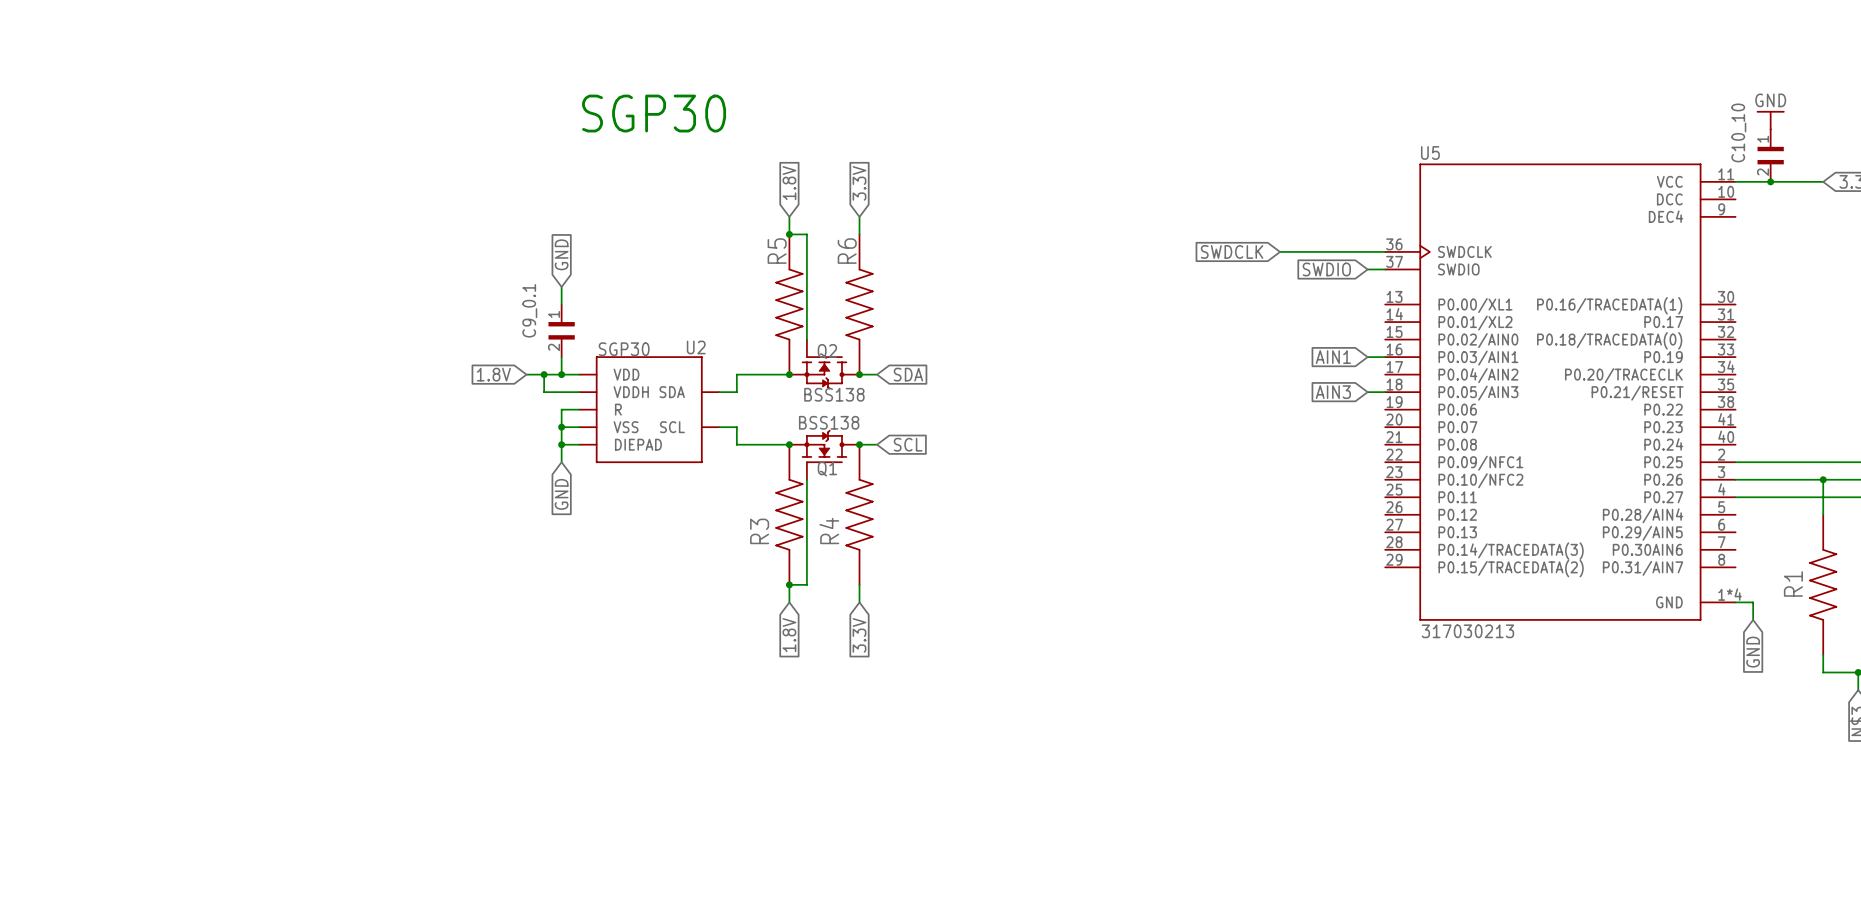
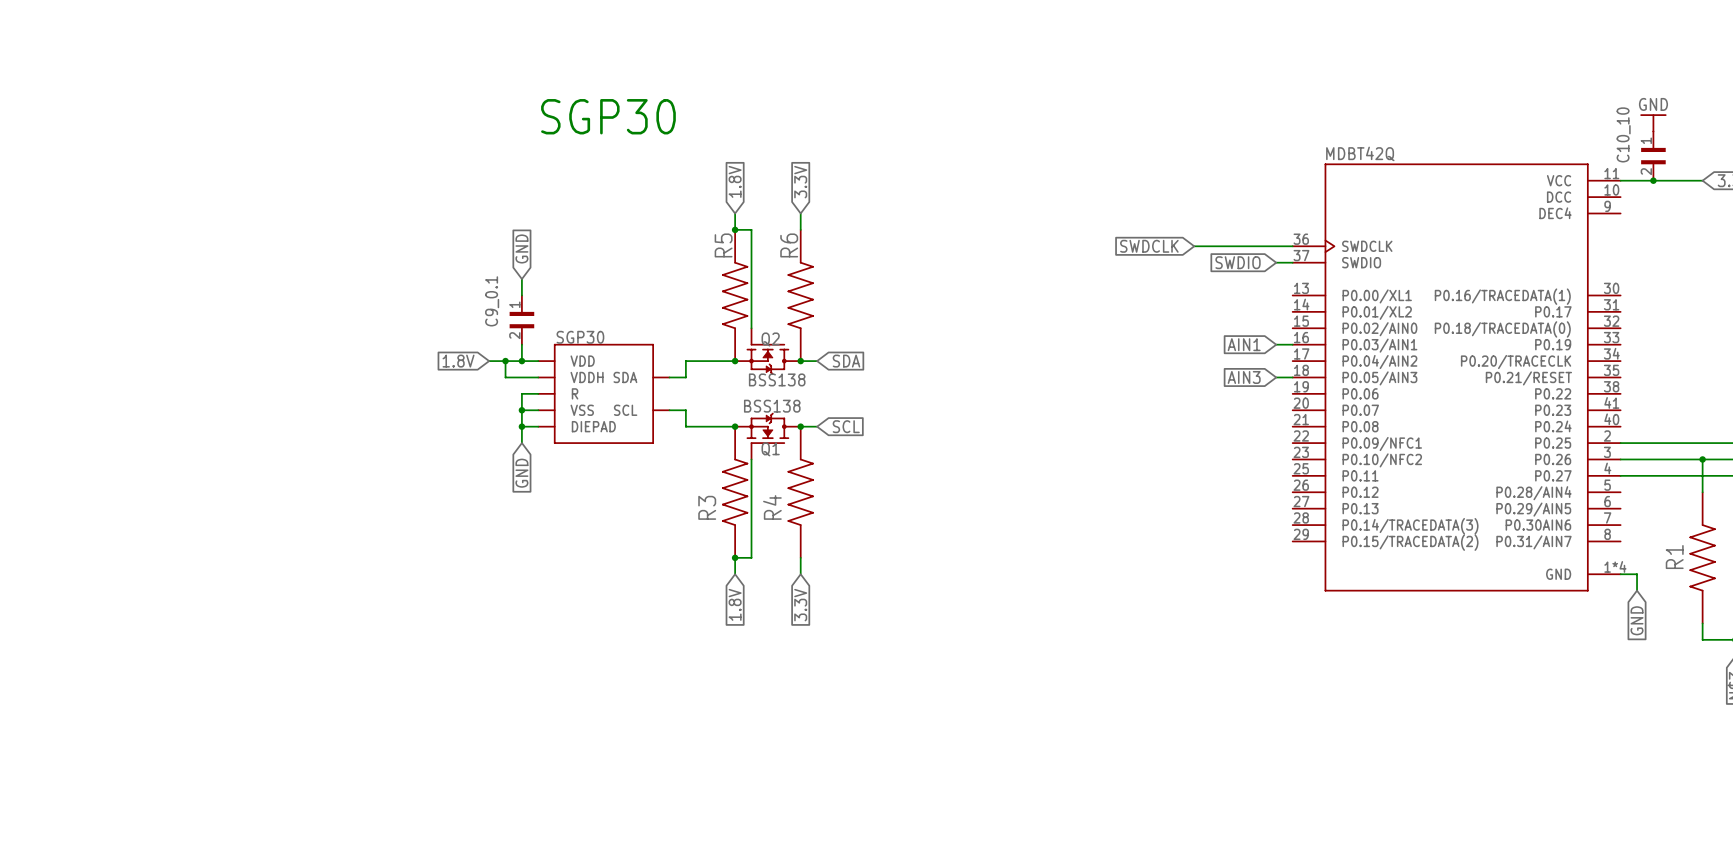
U5 name: U5 (1430, 152) -> MDBT42Q (1360, 153)
U2 name: U2 (696, 347) -> none
U5 value: 317030213 (1467, 631) -> none

